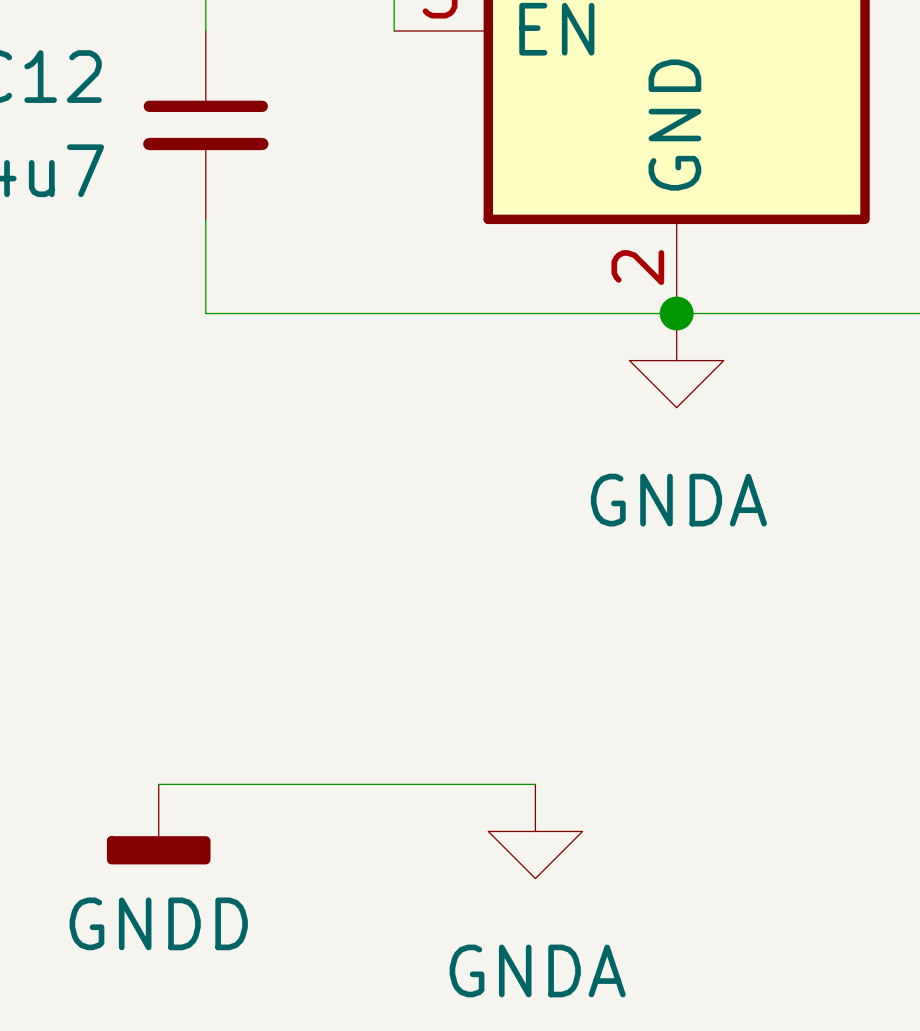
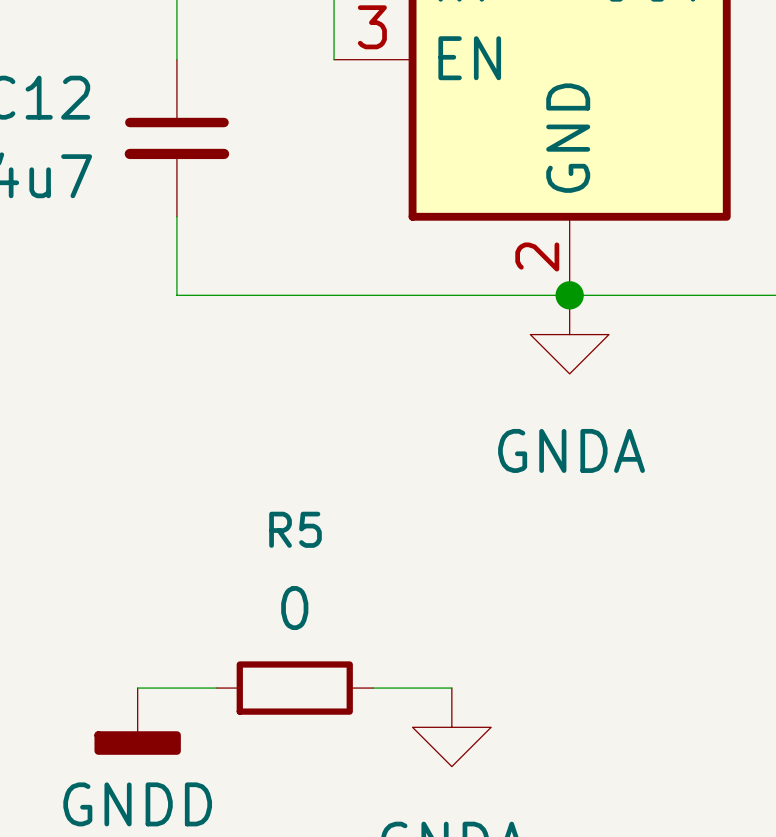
wire: (252, 784) (441, 784) -> none
R5: none -> 0 (294, 688)

